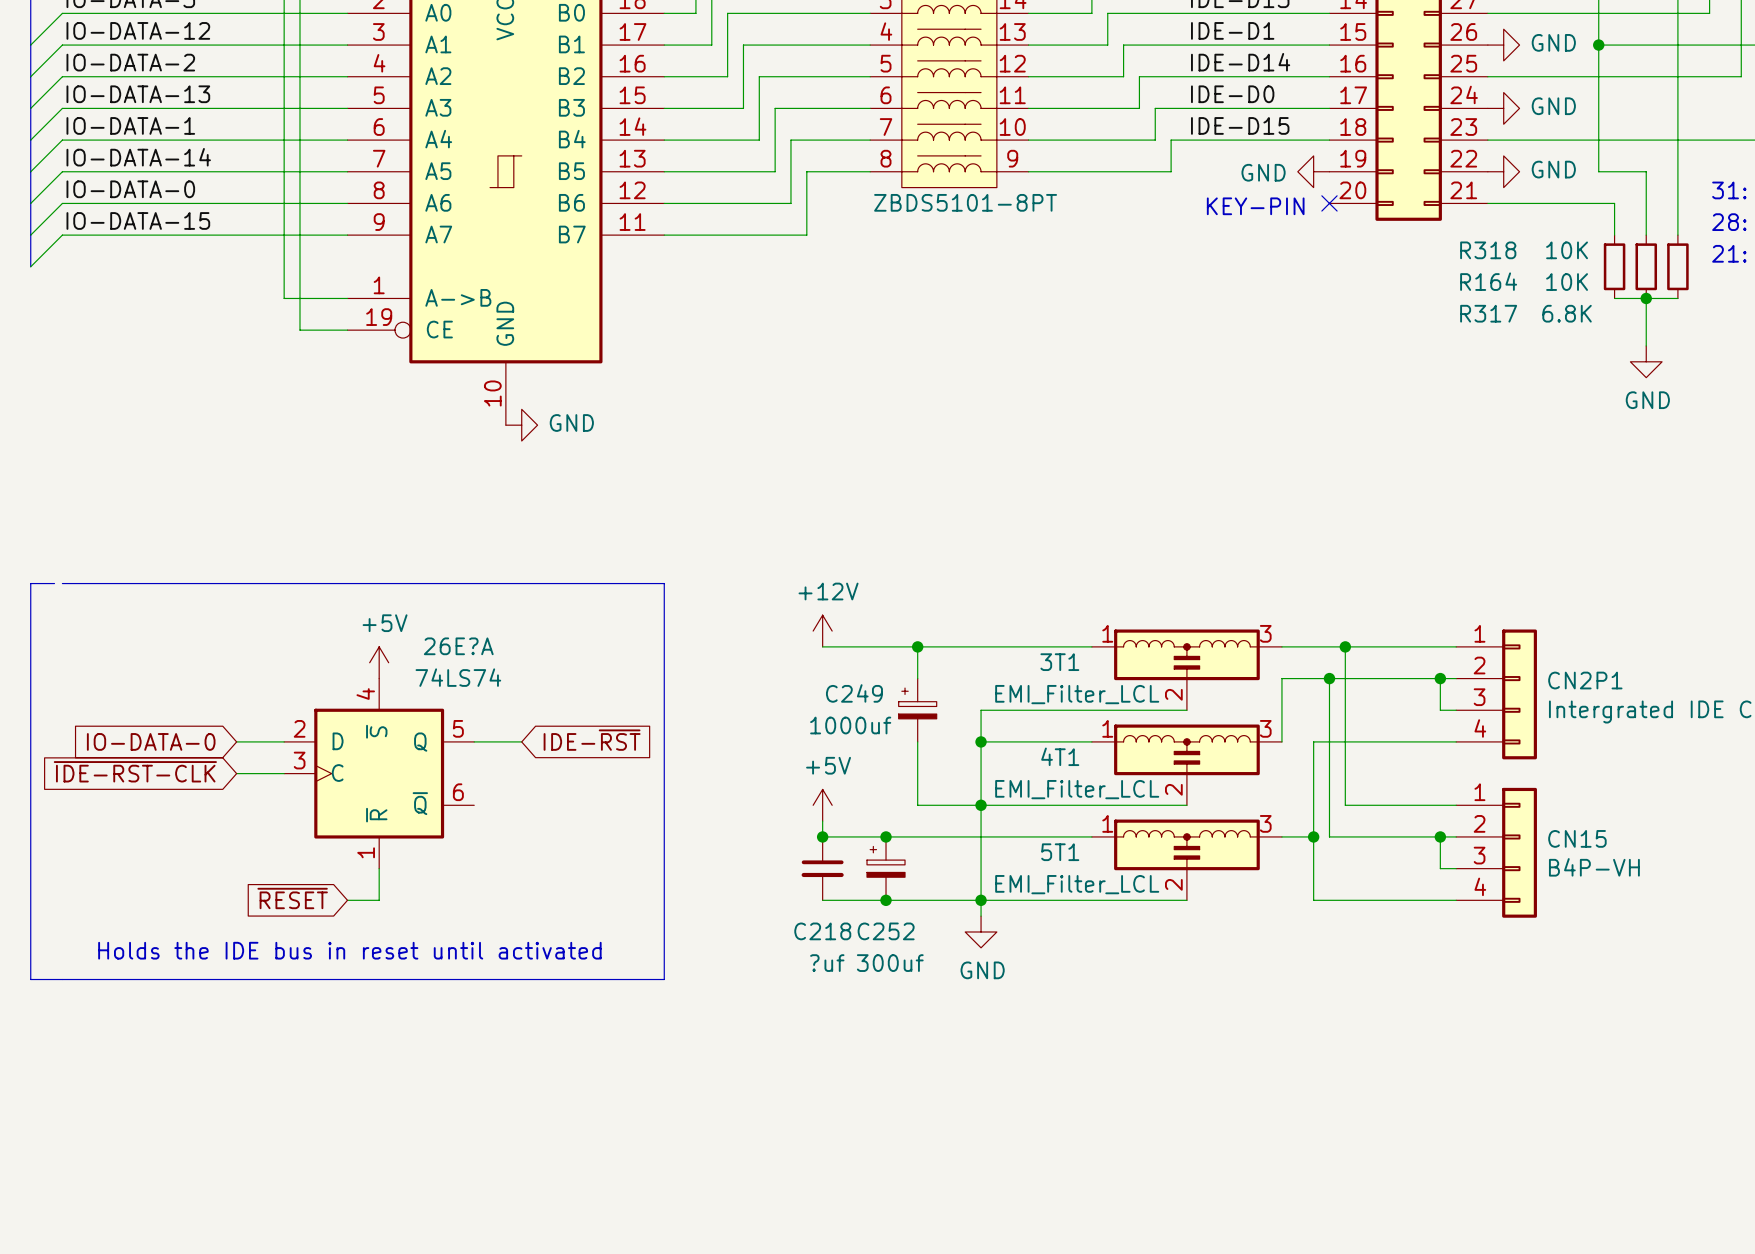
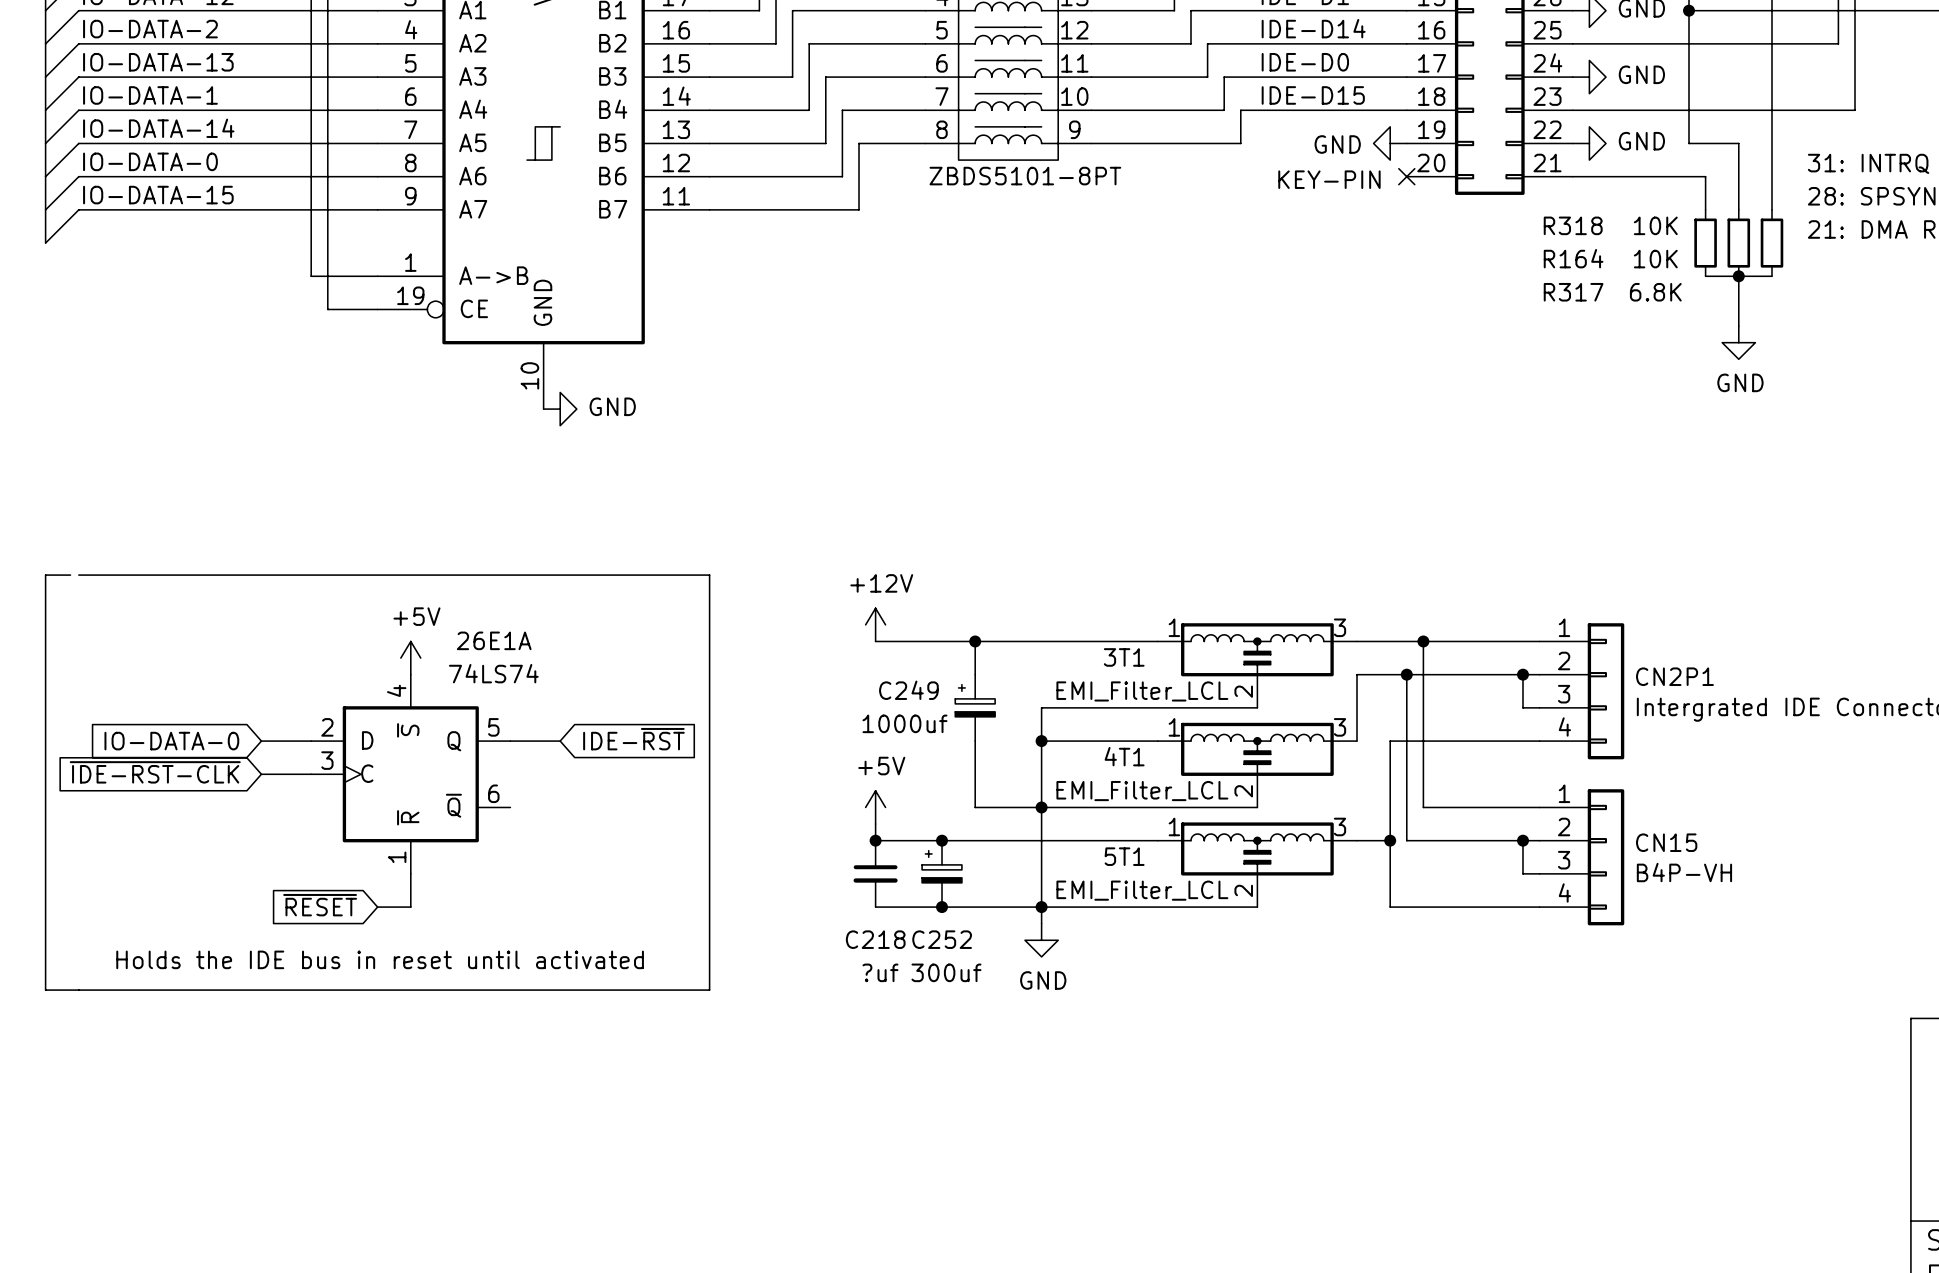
26E?A name: 26E?A (458, 646) -> 26E1A (494, 640)

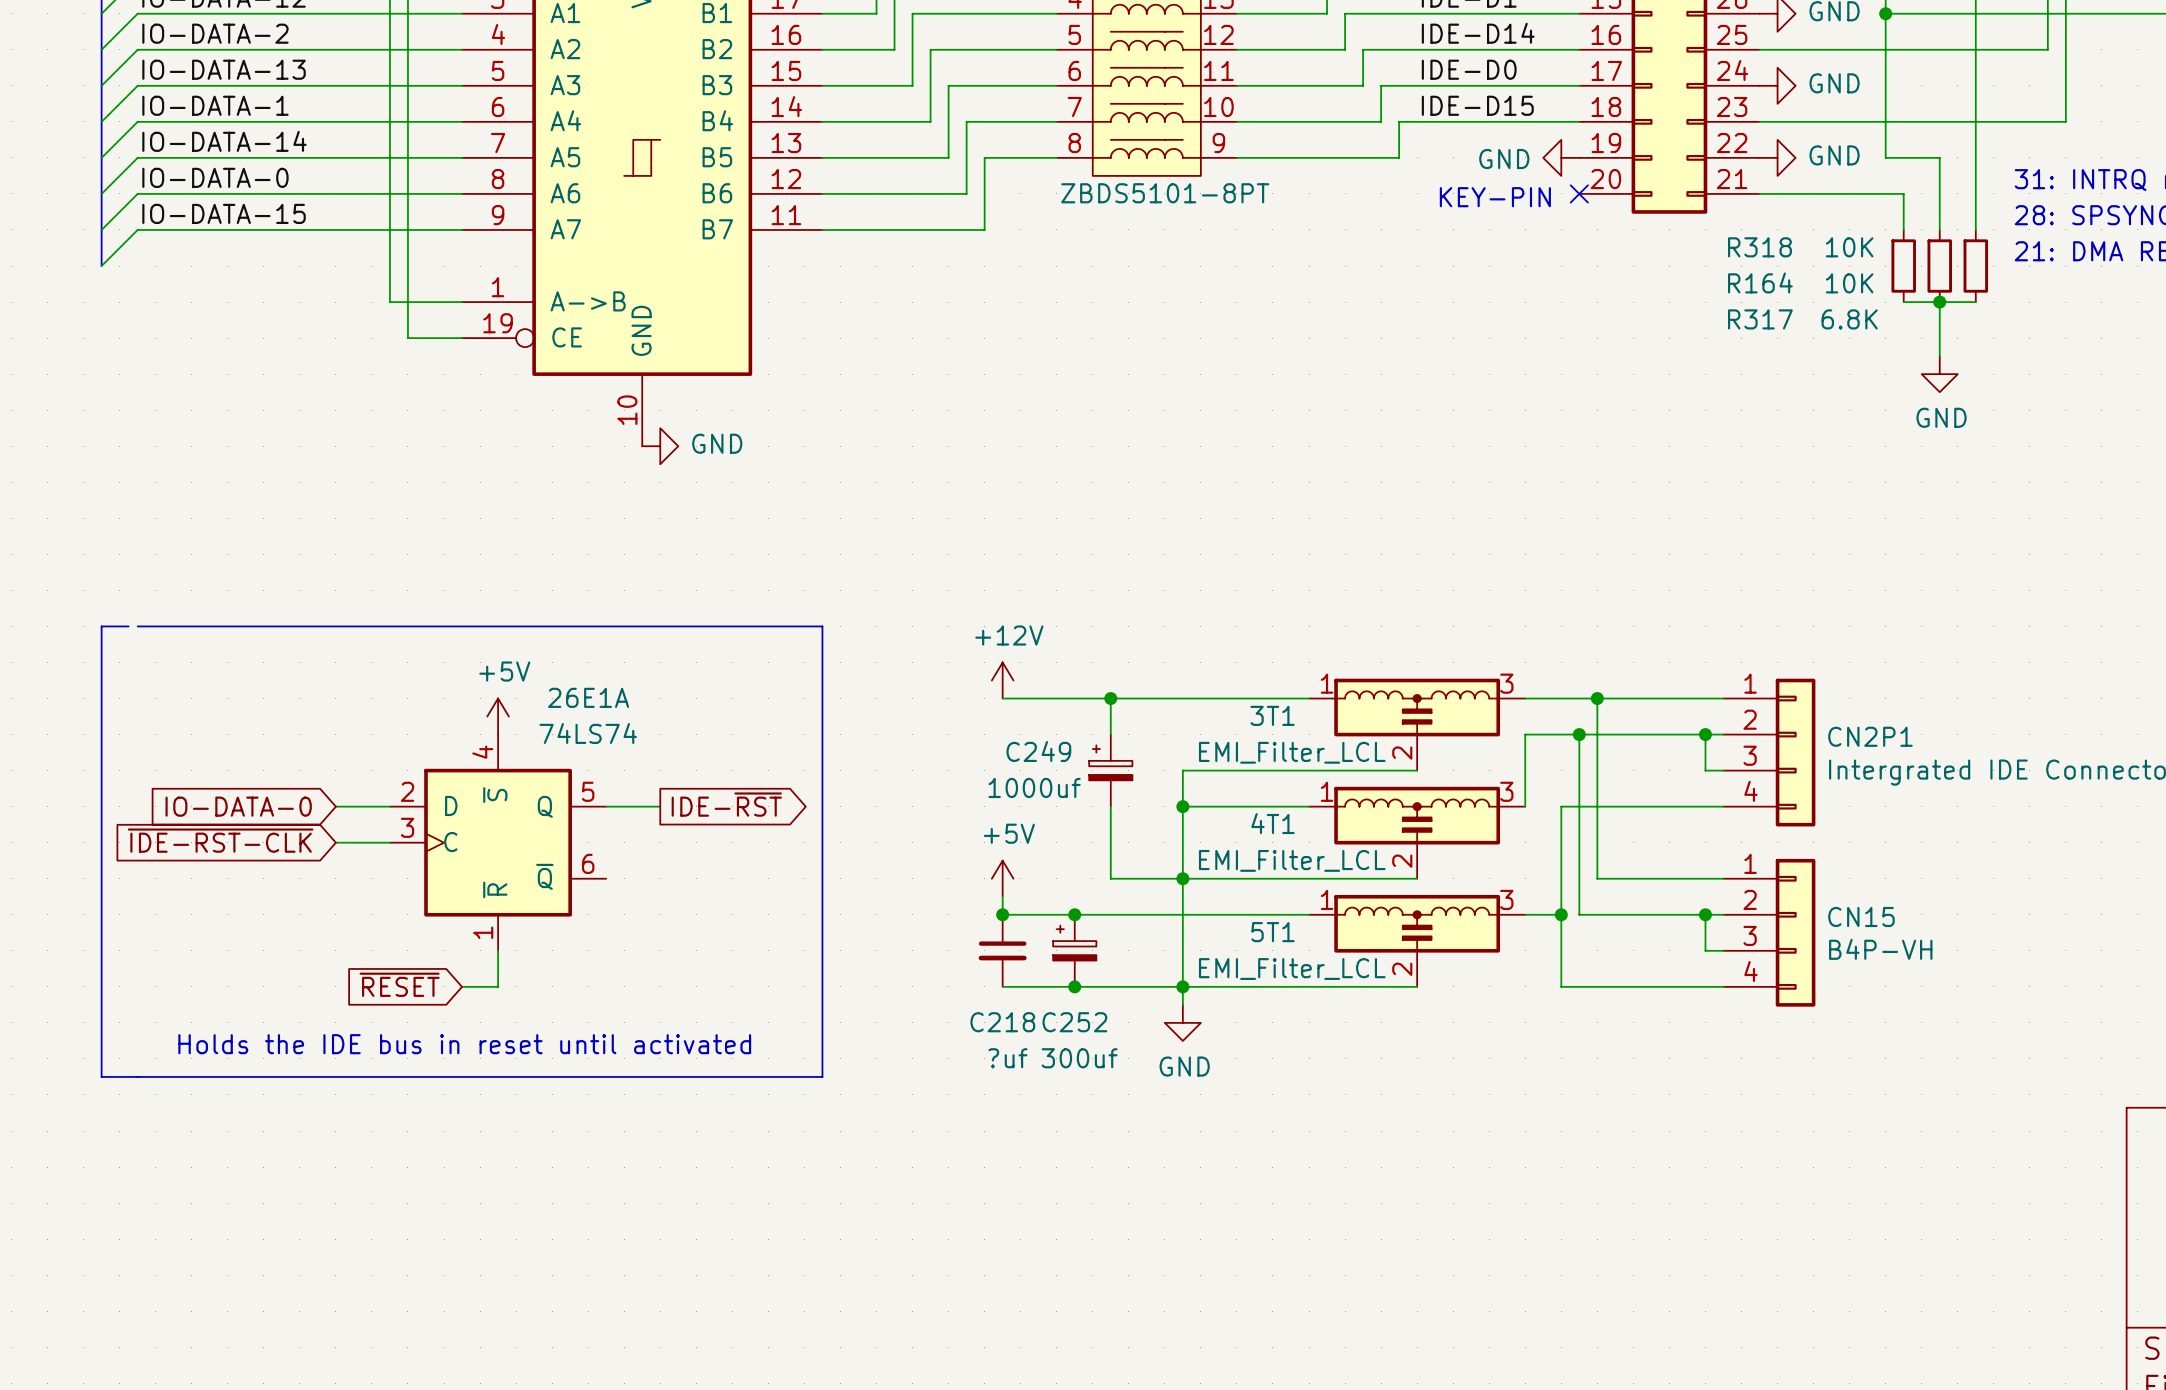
global label shape: input (633, 739) -> output (726, 804)

